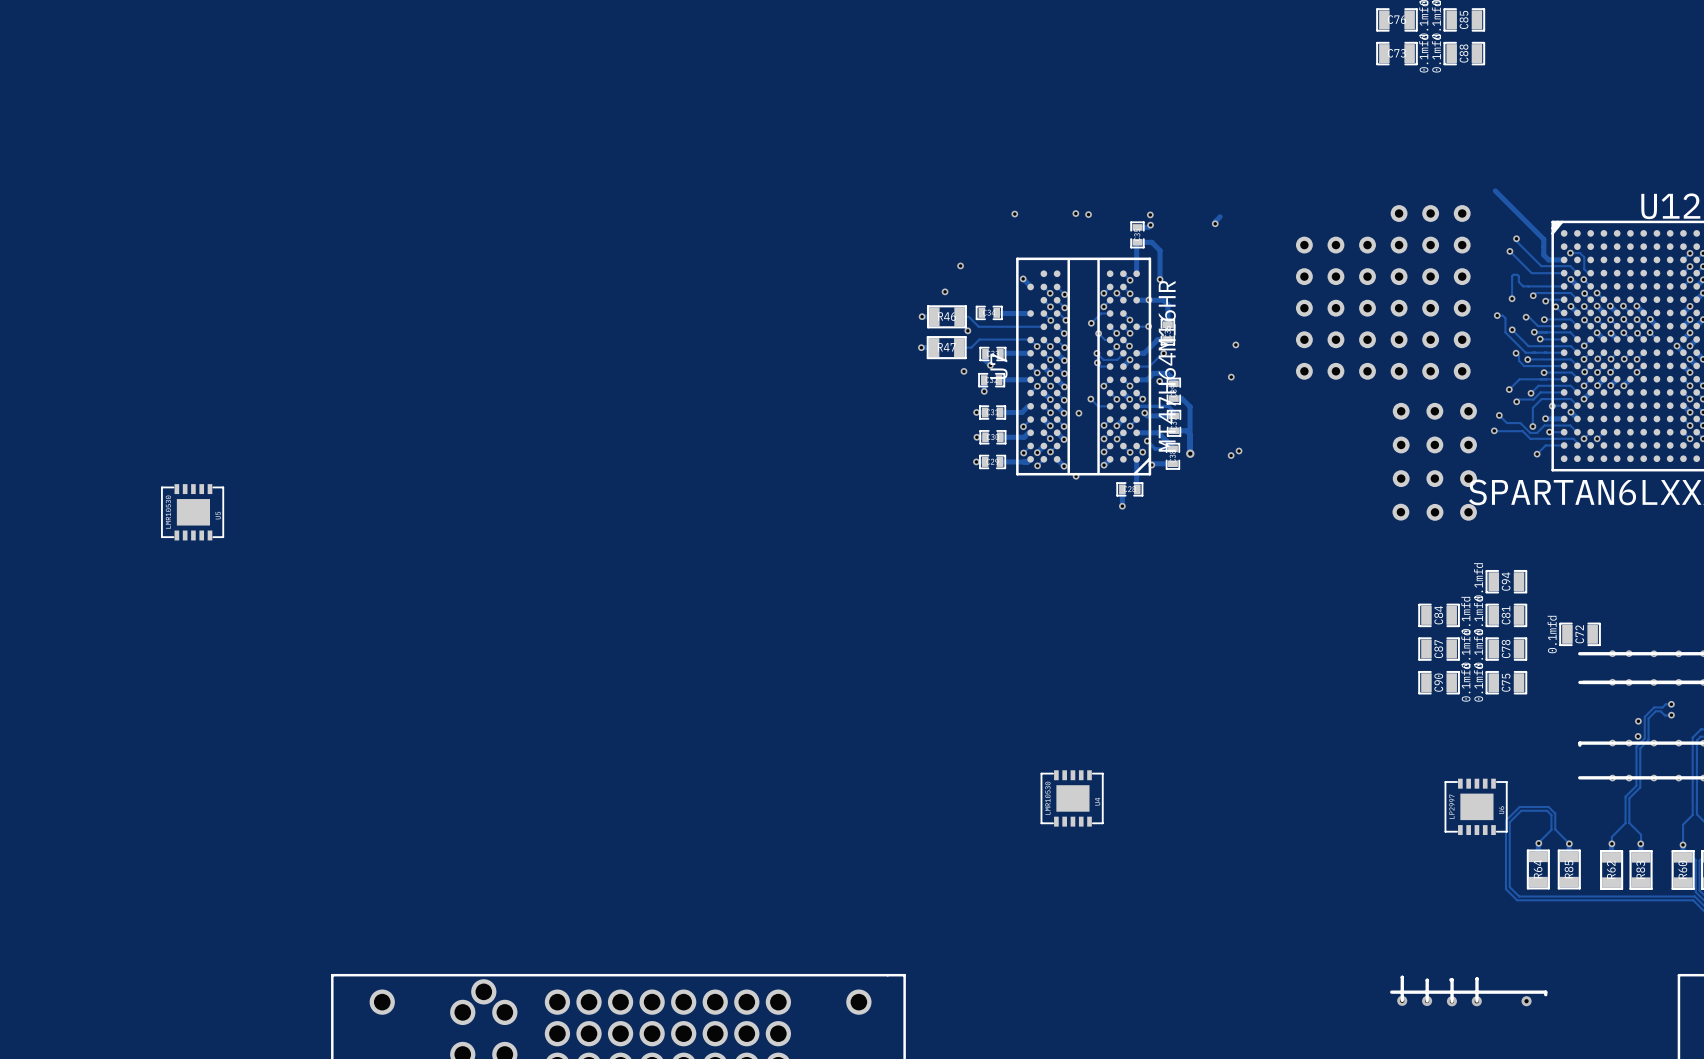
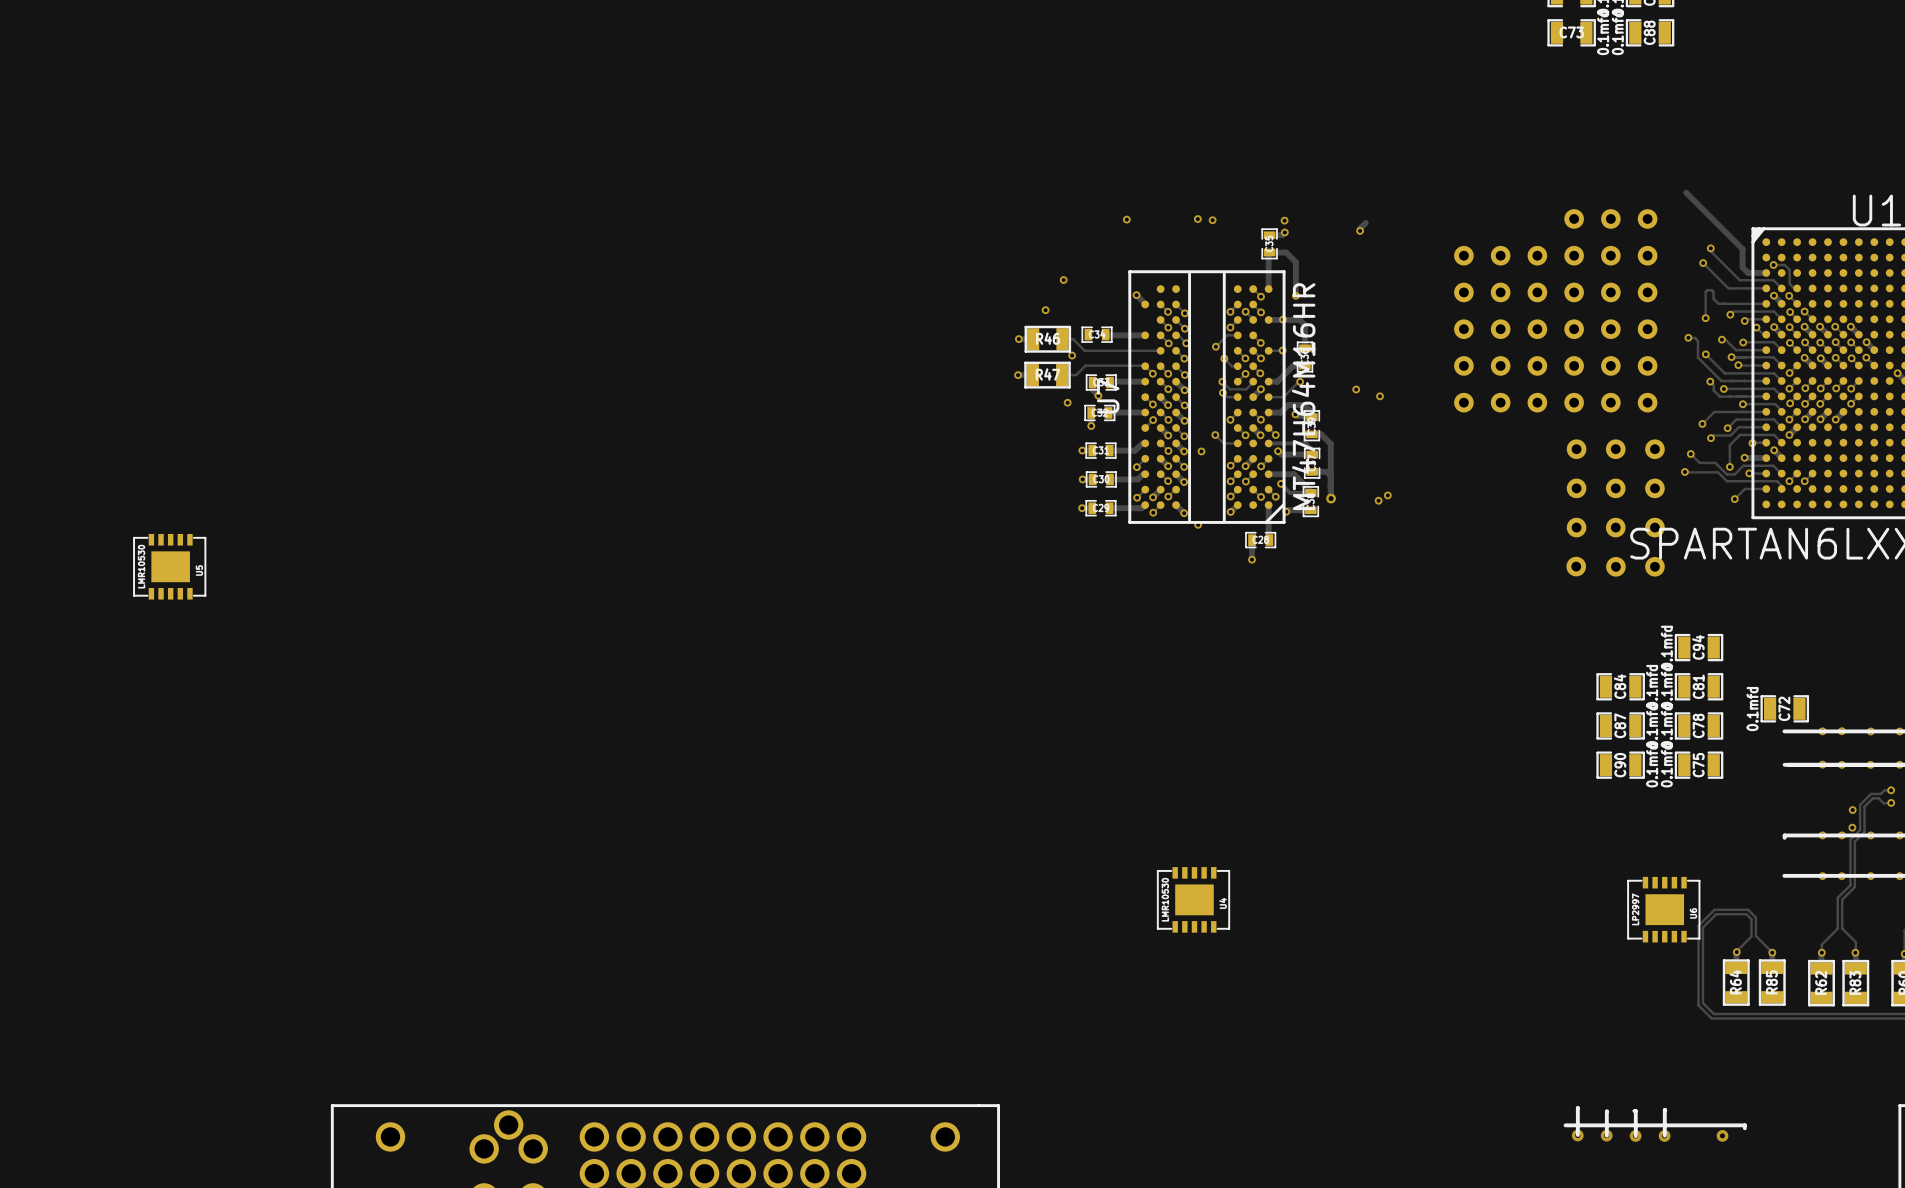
via: (1235, 344) -> none
via: none -> (1356, 389)
via: none -> (1379, 396)
via: (1231, 377) -> none

